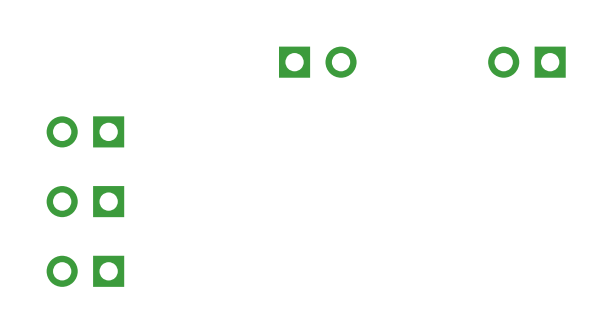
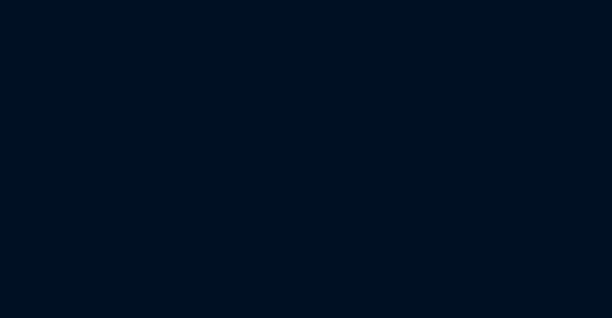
part: (317, 62) -> none
part: (526, 62) -> none
part: (85, 131) -> none
part: (85, 201) -> none
part: (85, 271) -> none

